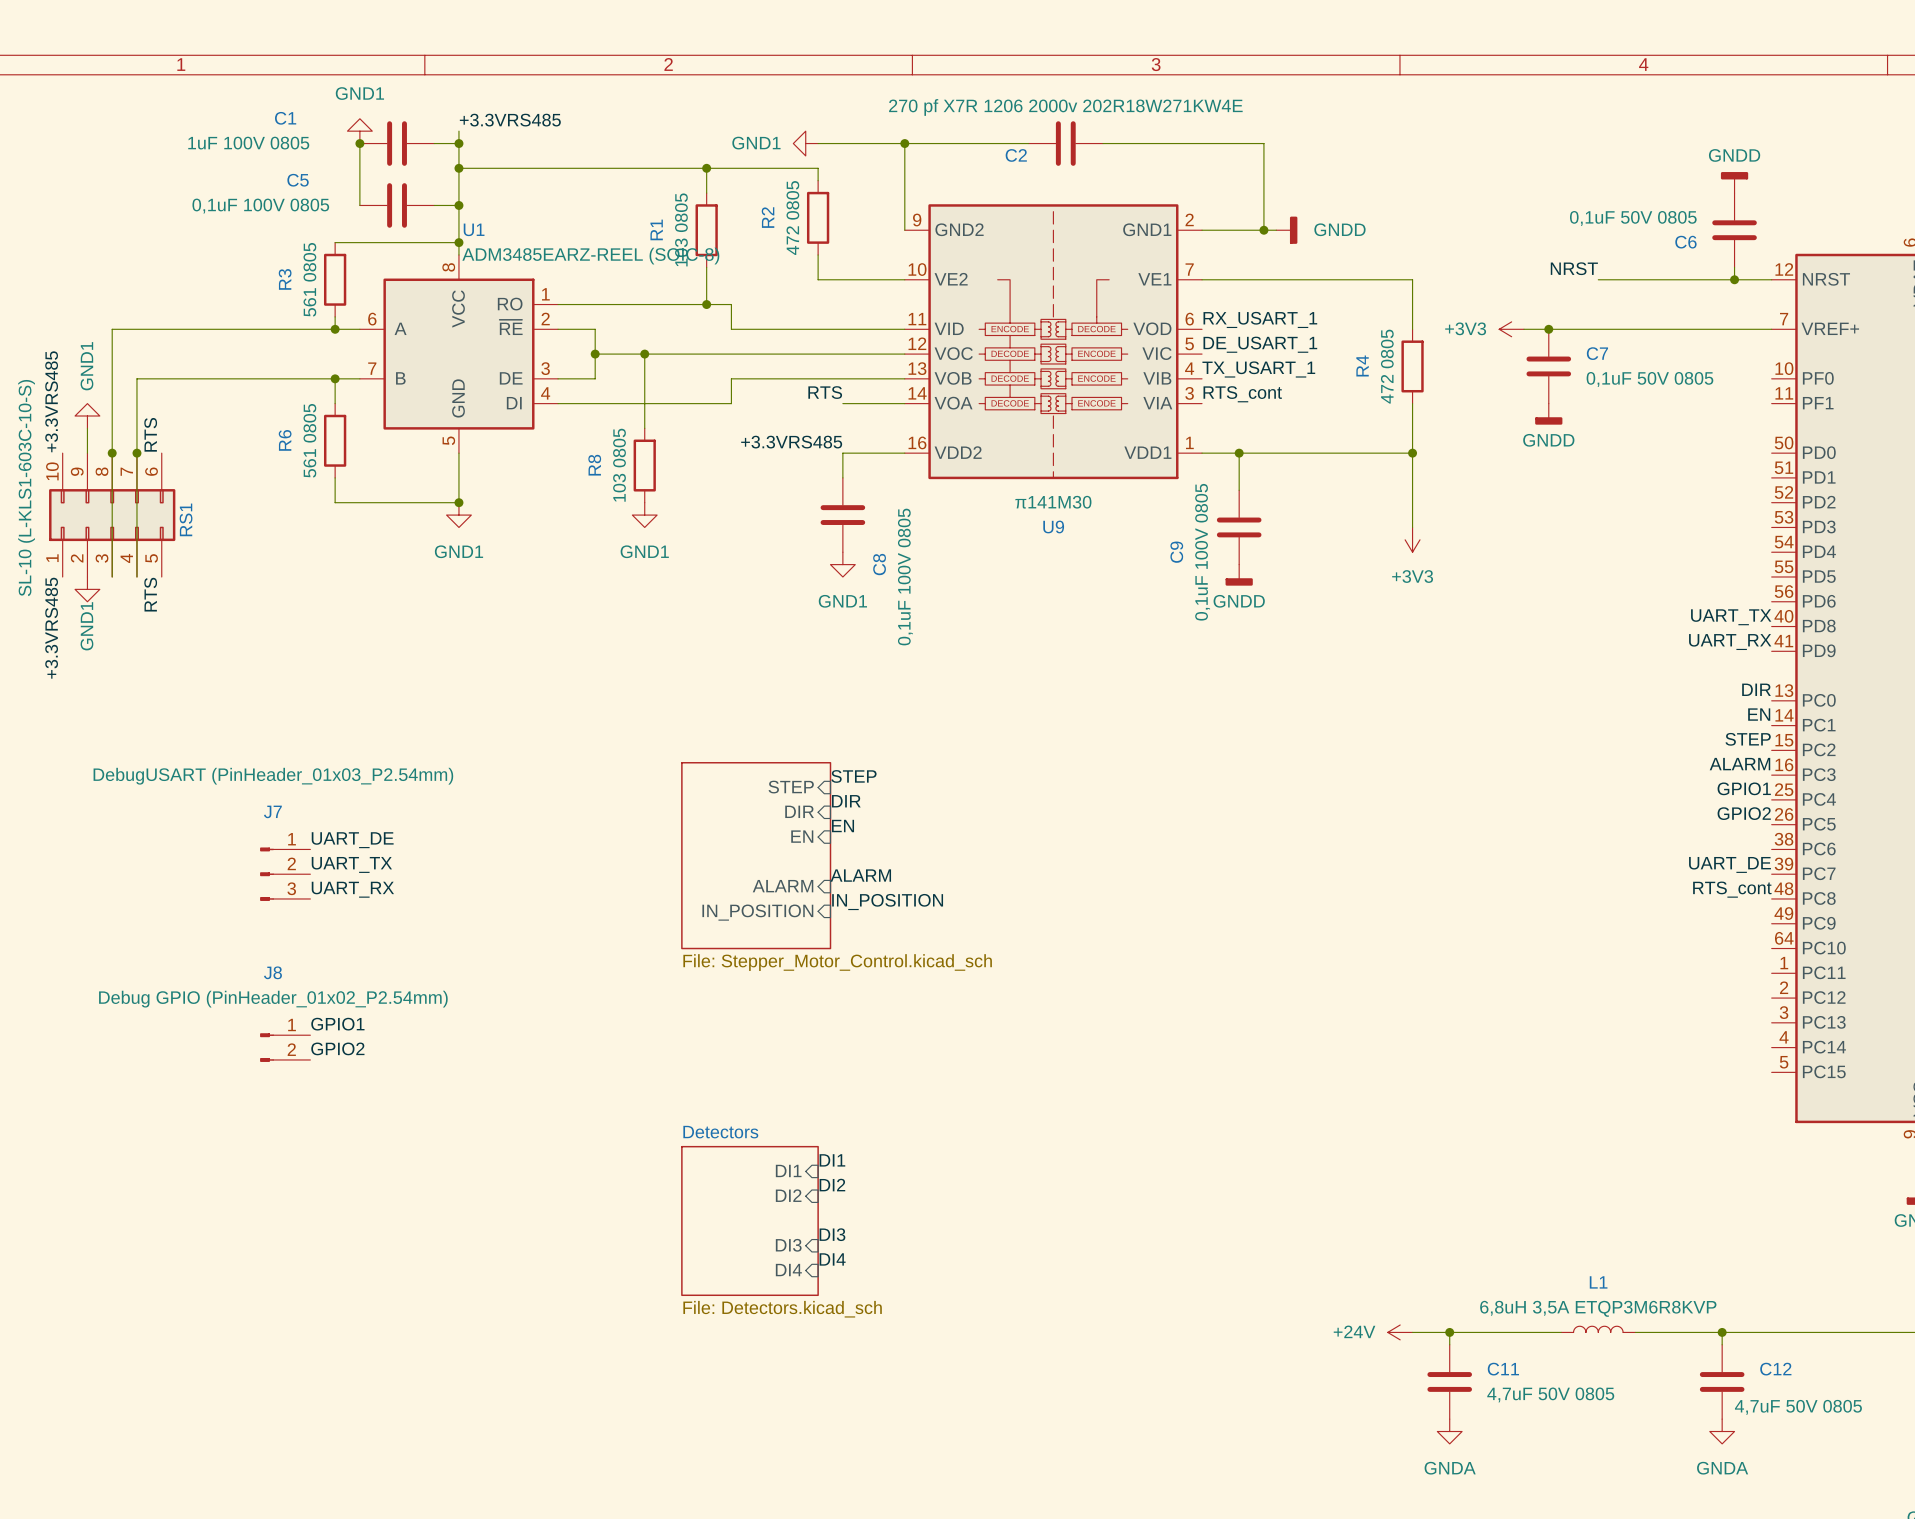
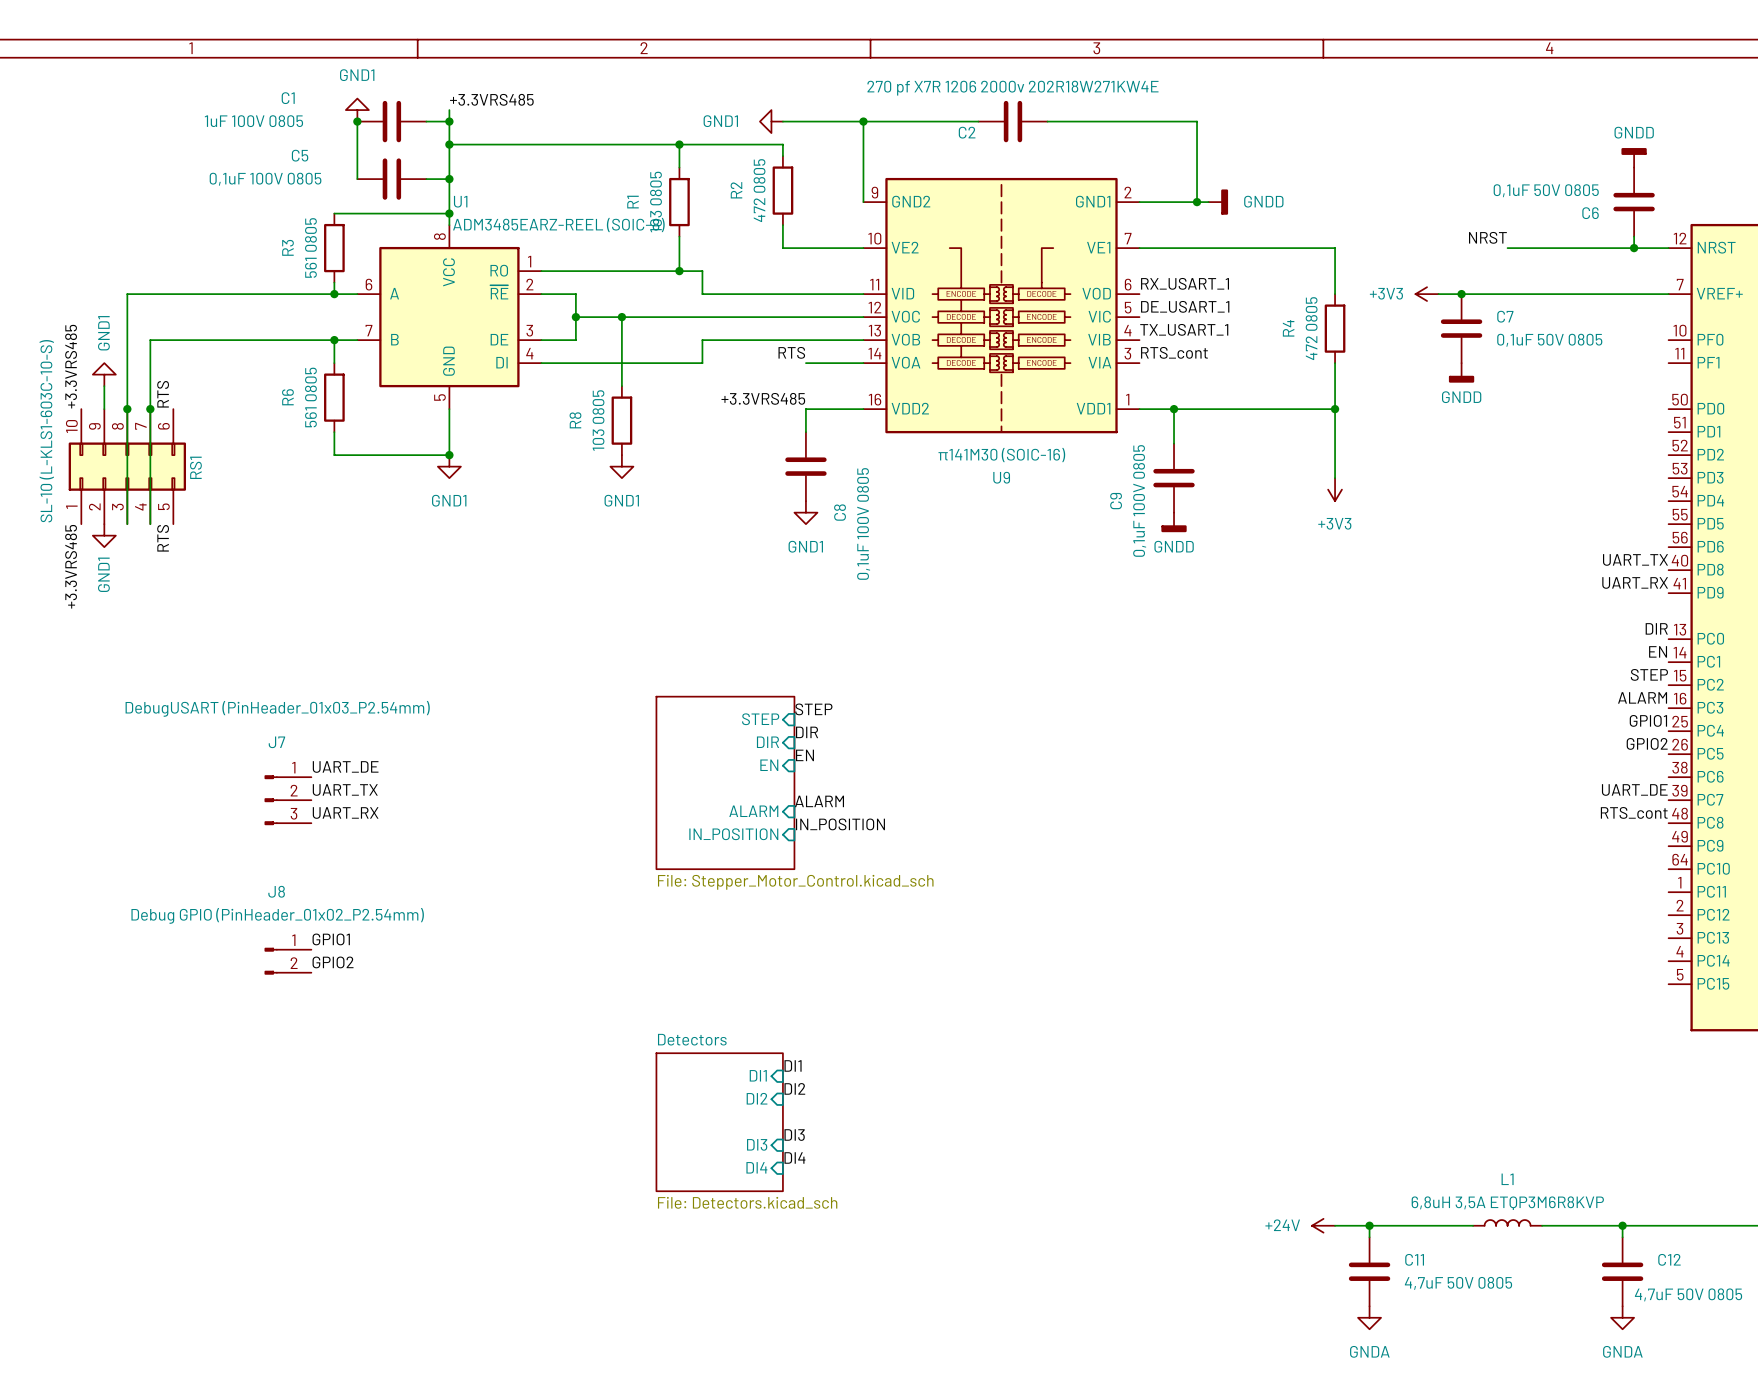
U9 value: π141M30 (1053, 502) -> π141M30 (SOIC-16) (1001, 455)

